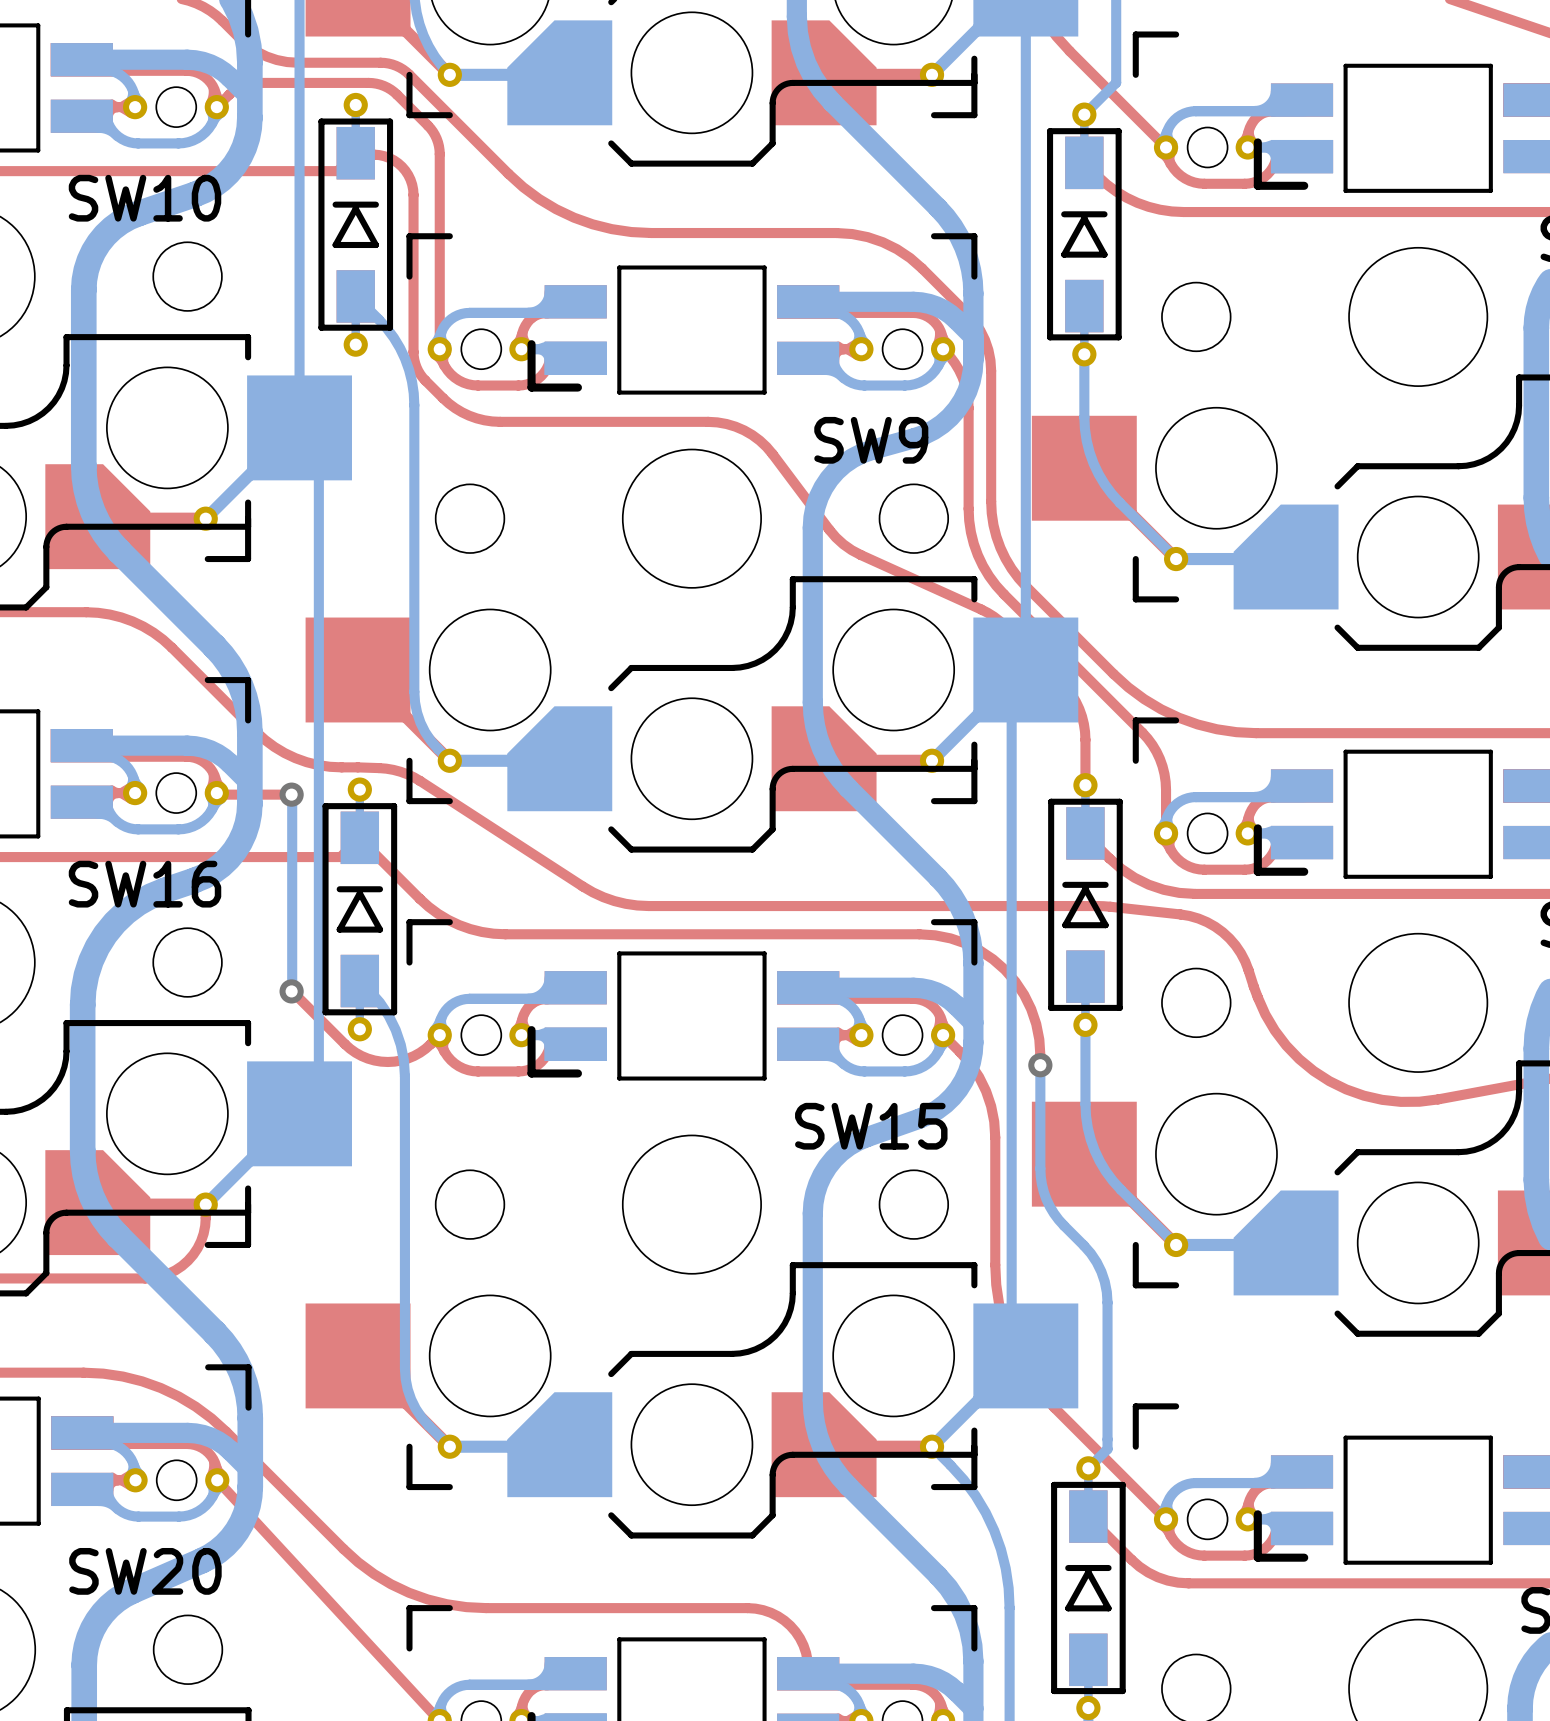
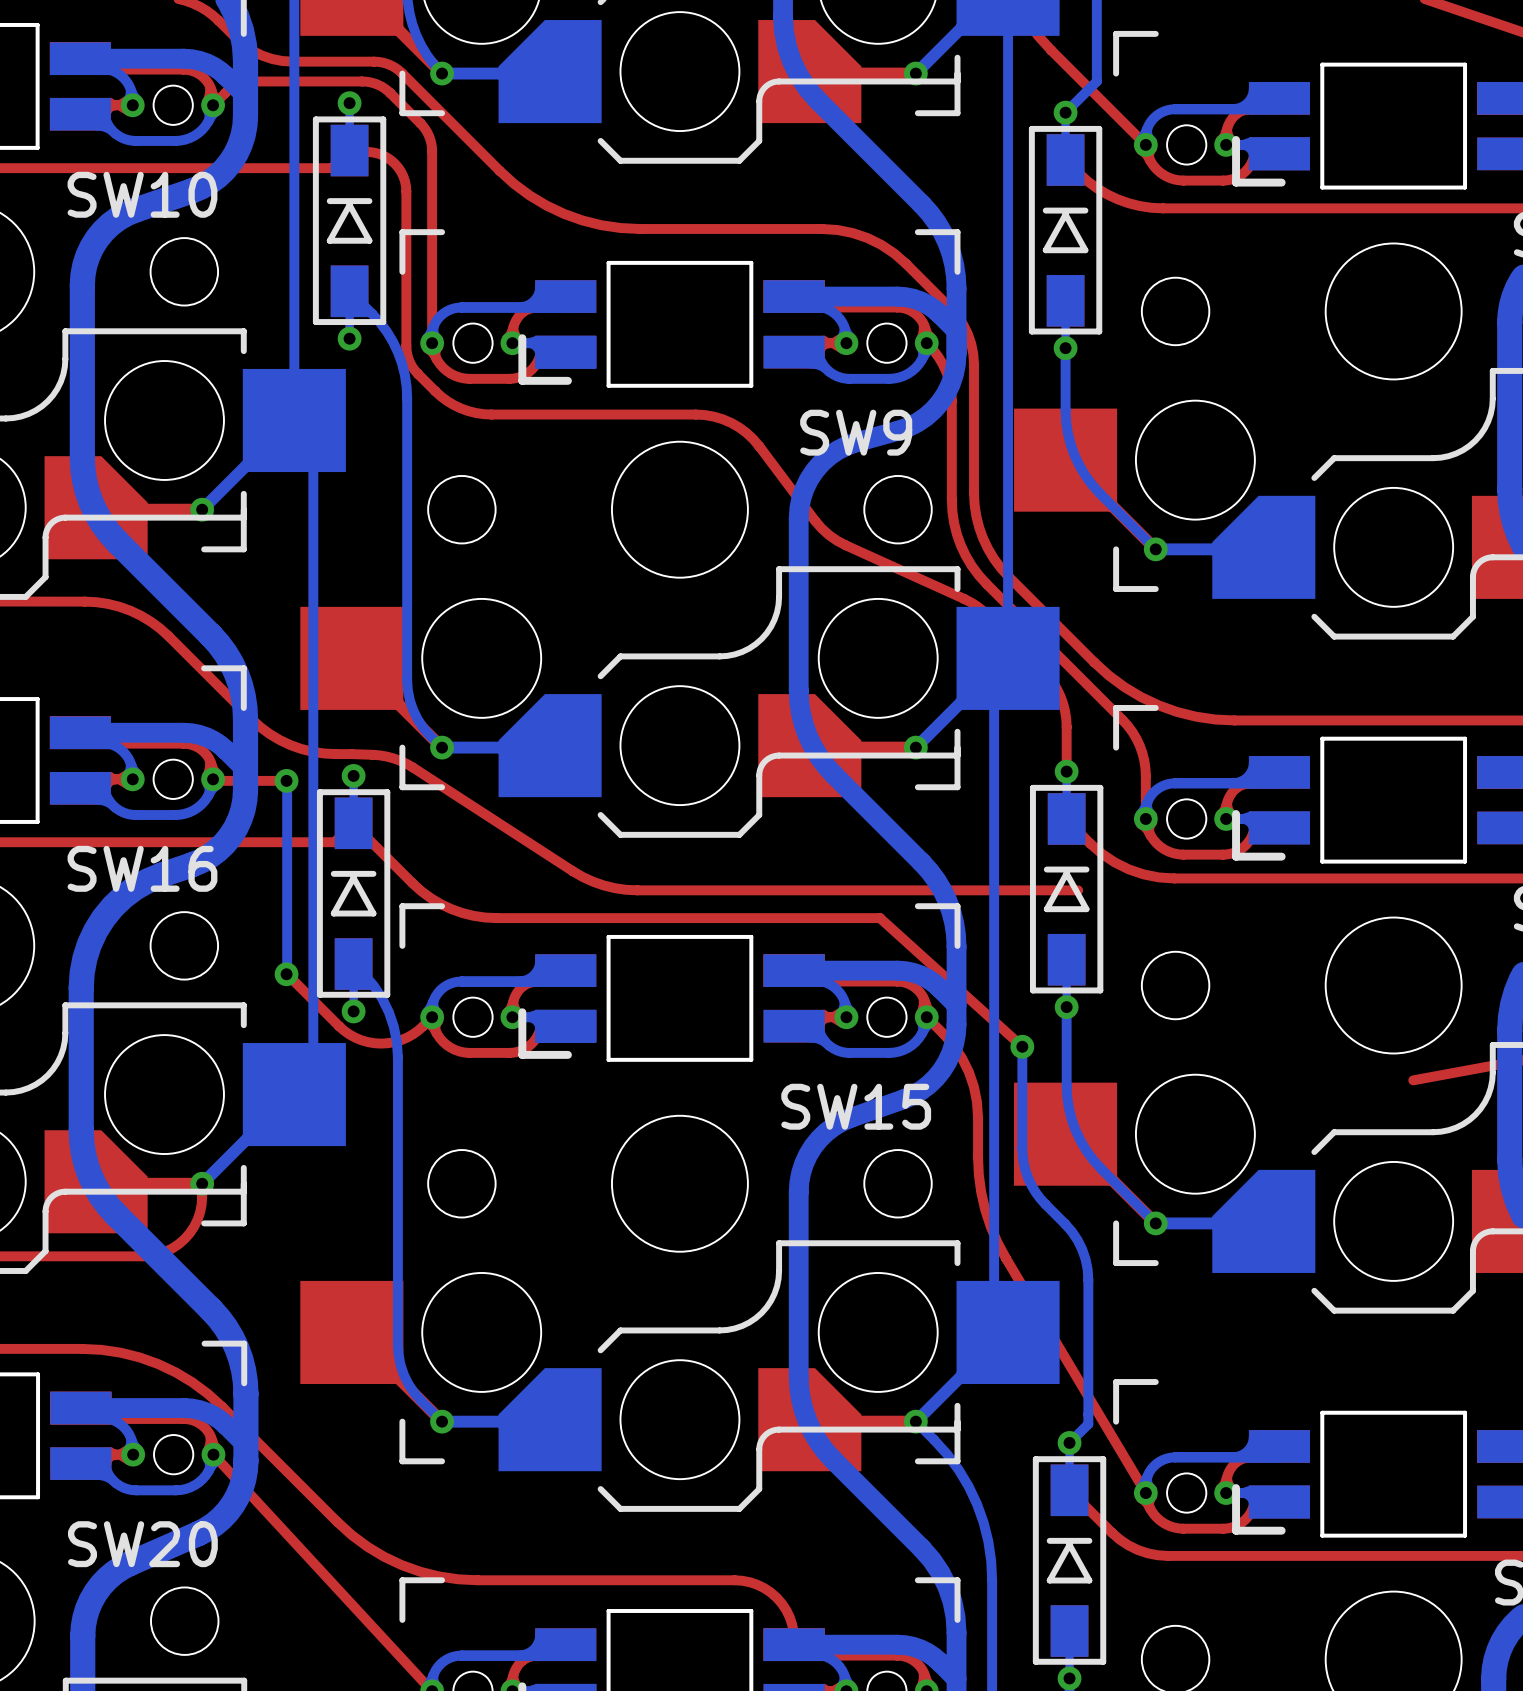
top track: (1097, 906) (1189, 915) (1215, 926) (1229, 938) (1240, 953) (1257, 997) (1274, 1030) (1286, 1045) (1313, 1070) (1346, 1089) (1382, 1099) (1419, 1101) (1438, 1099) -> none
top track: (895, 934) (935, 935) (950, 938) (979, 950) (1004, 969) (1024, 994) (1031, 1009) (1039, 1039) (1040, 1065) -> (879, 918) (1022, 1046)
top track: (995, 1177) (996, 1284) (1003, 1323) (1019, 1360) (1029, 1377) (1054, 1407) (1166, 1519) -> (978, 1156) (978, 1174) (985, 1209) (997, 1242) (1145, 1493)

